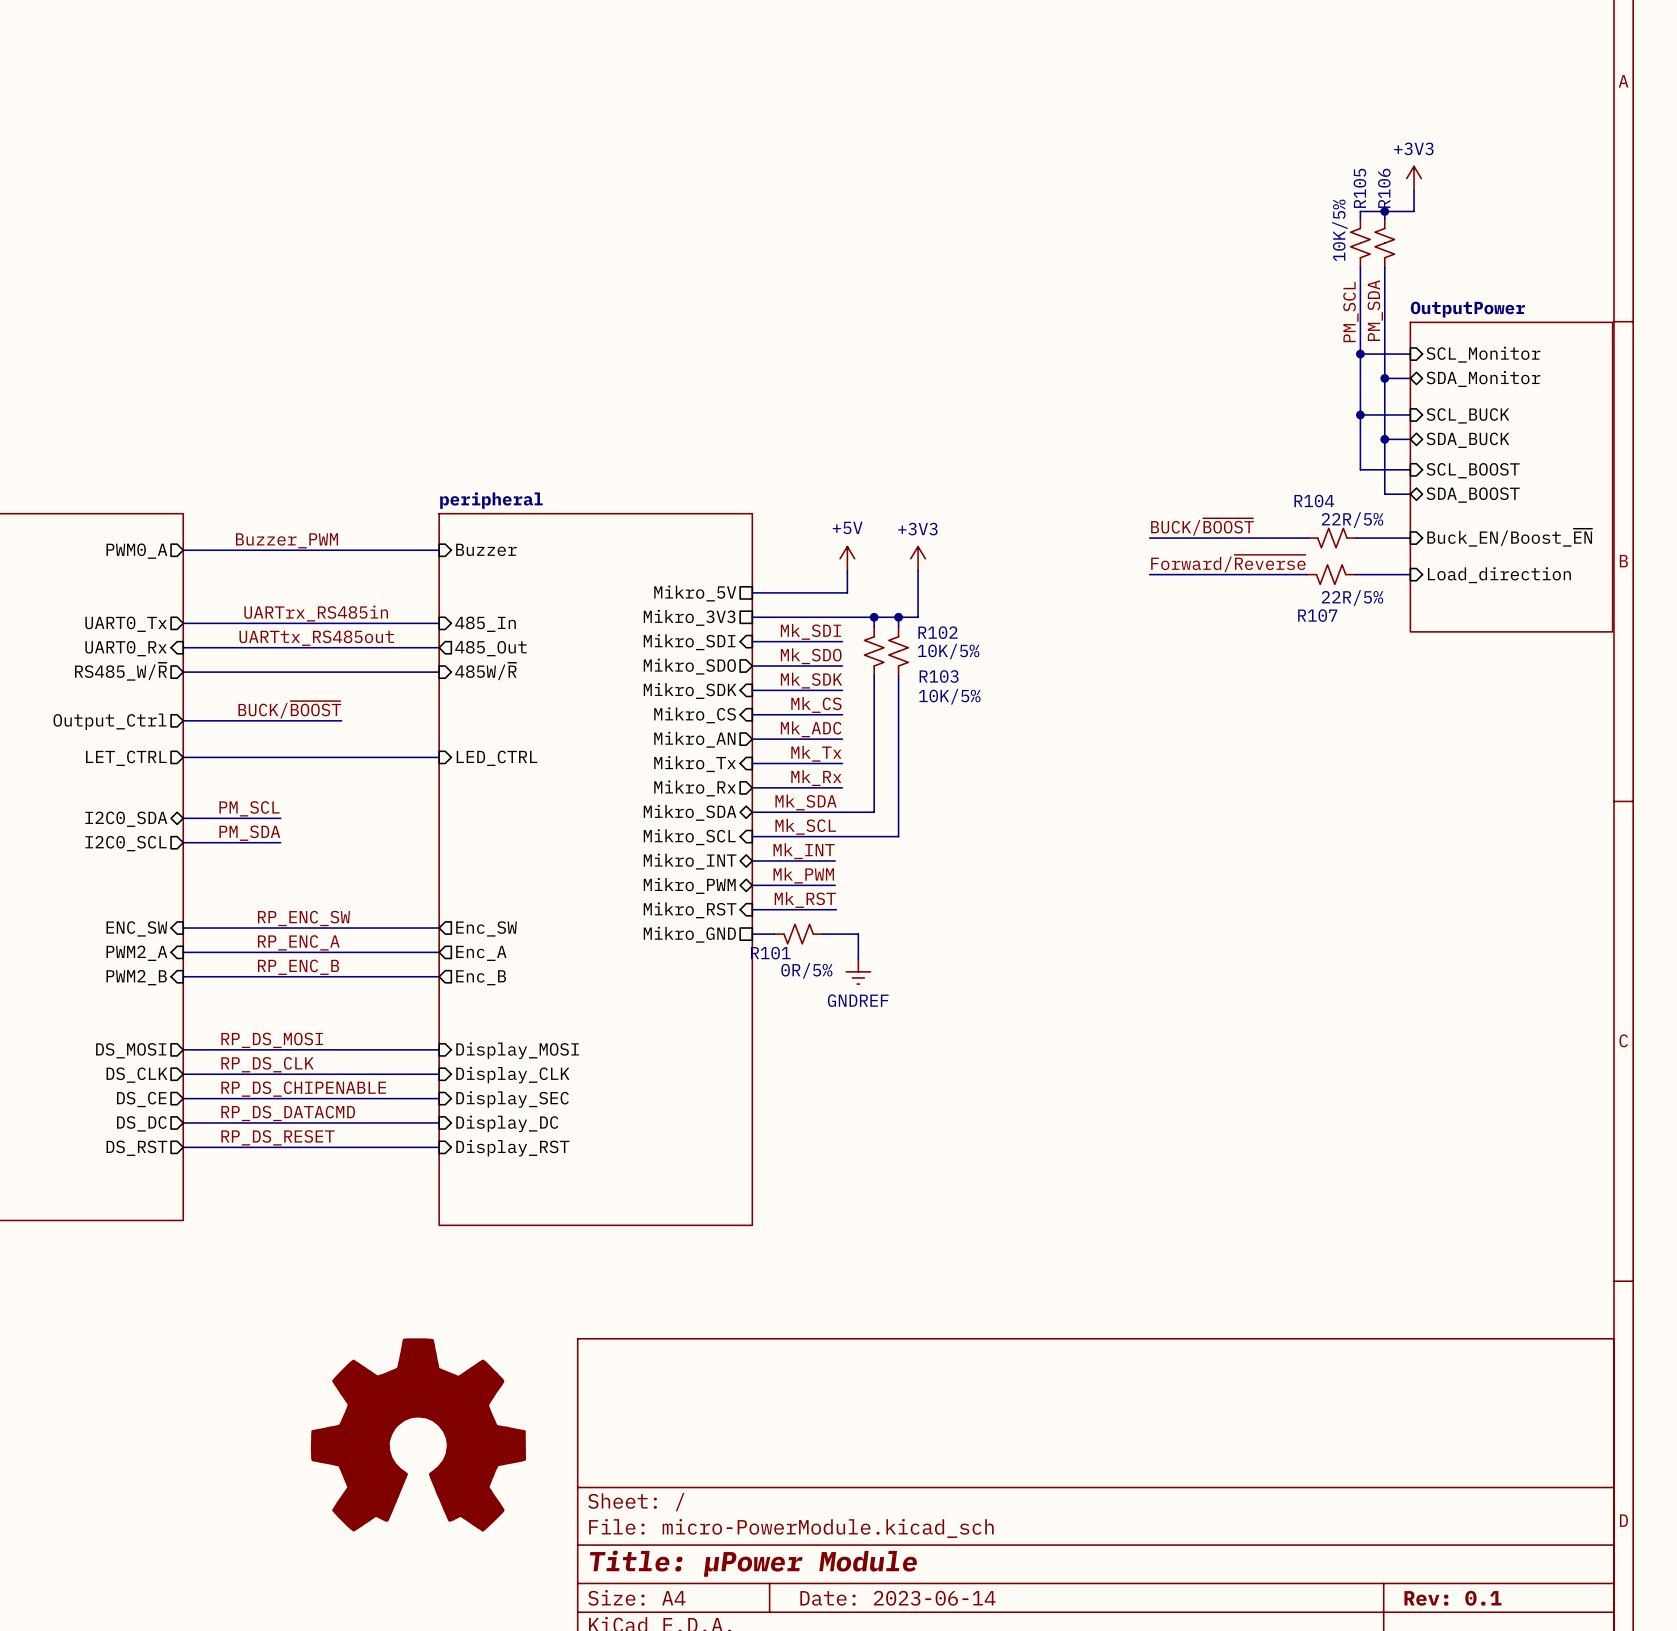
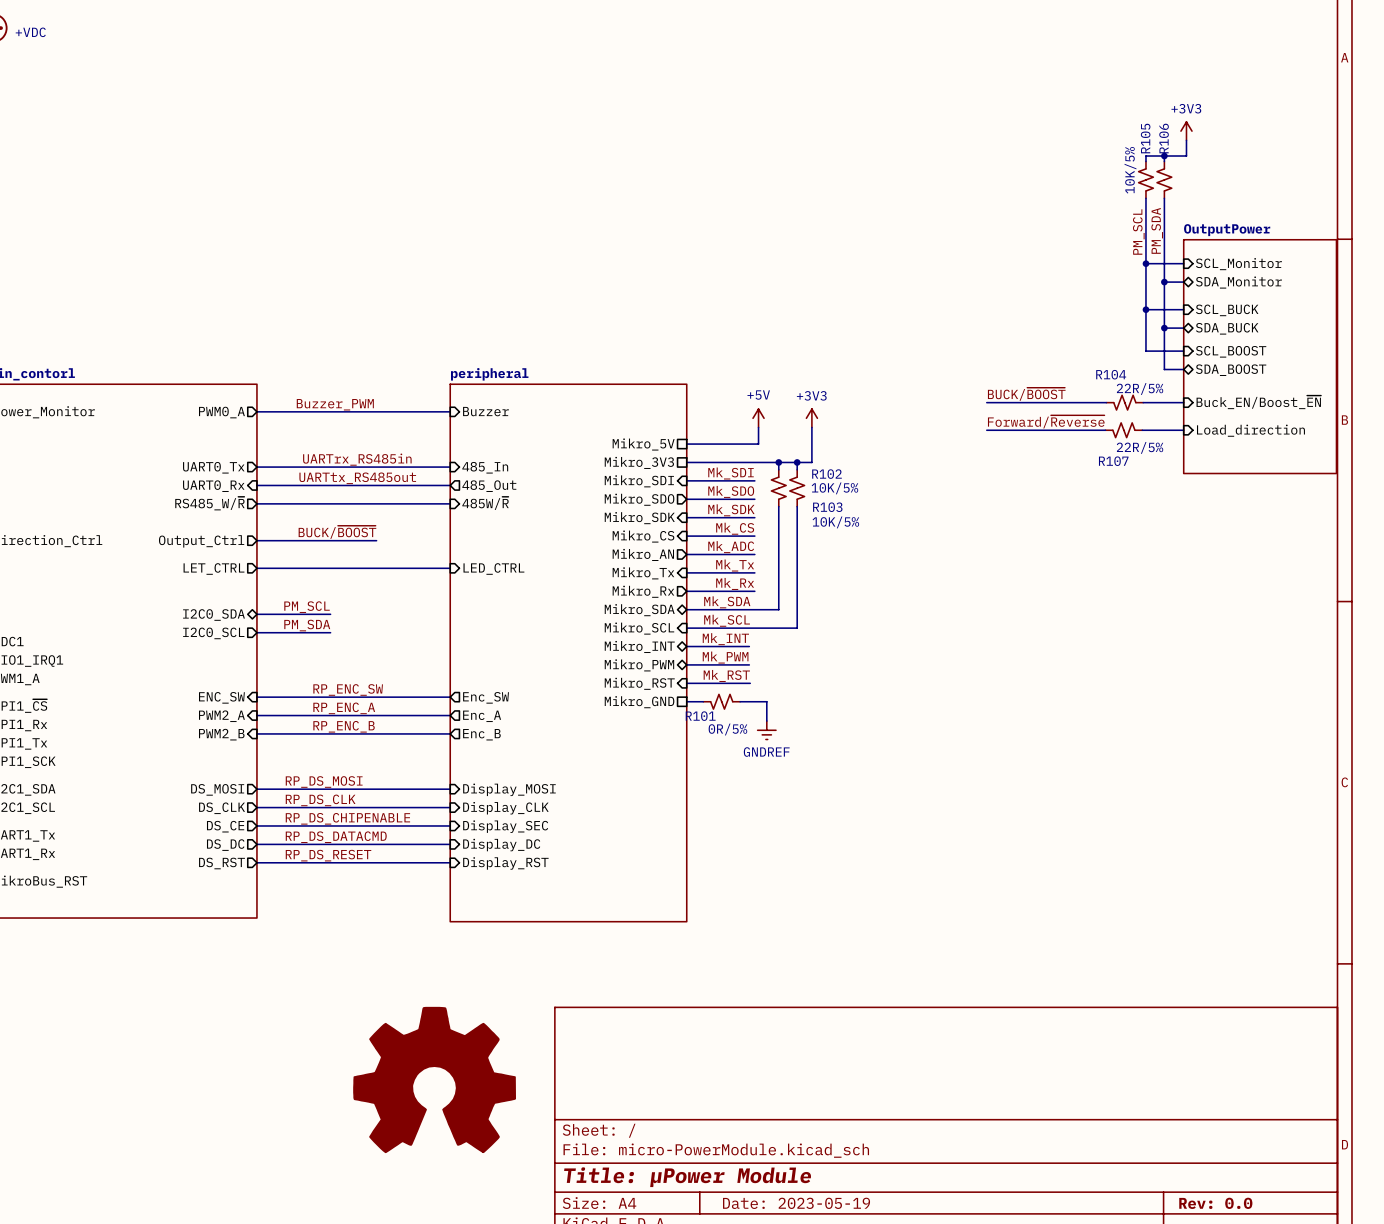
title block: Date: 2023-06-14 (897, 1598) -> Date: 2023-05-19 (796, 1203)
title block: Rev: 0.1 (1452, 1598) -> Rev: 0.0 (1215, 1203)

